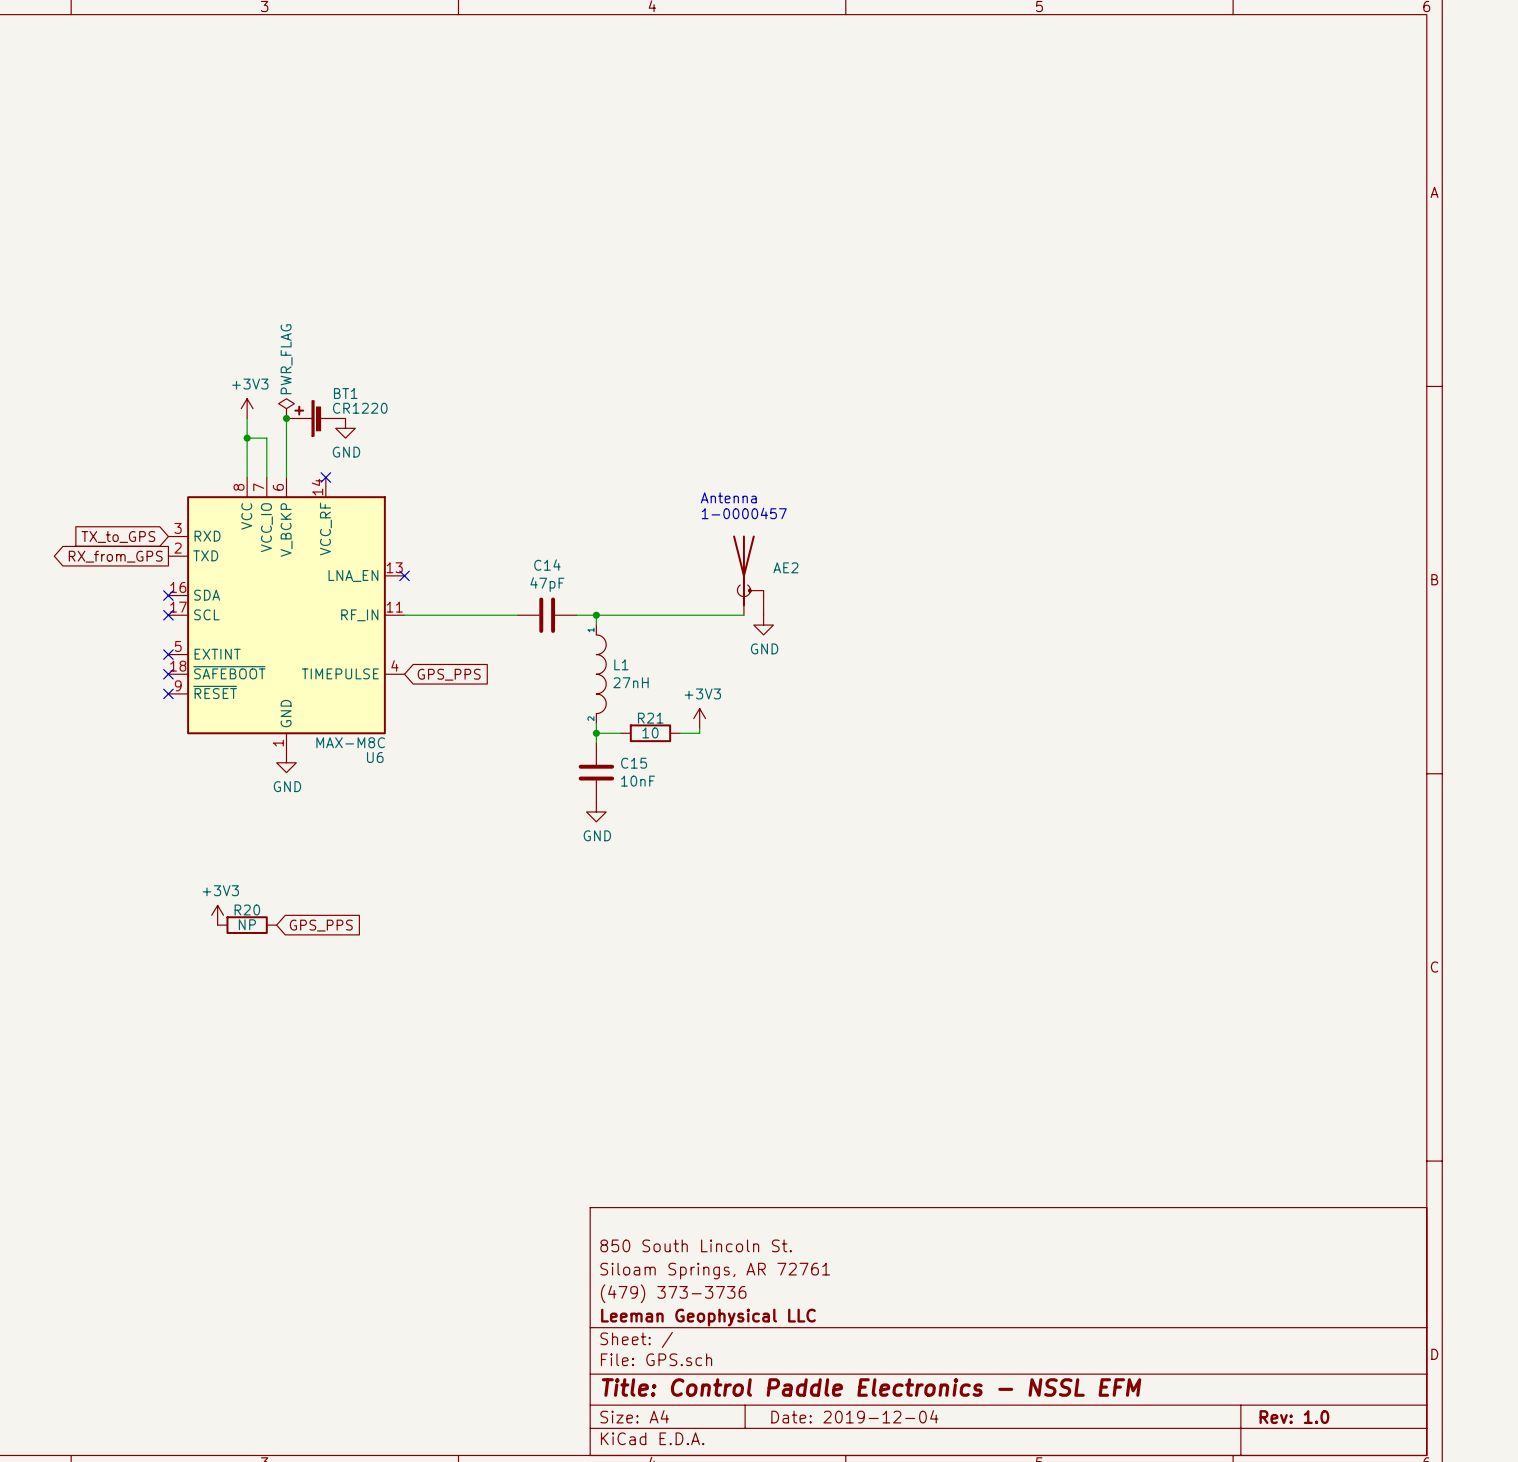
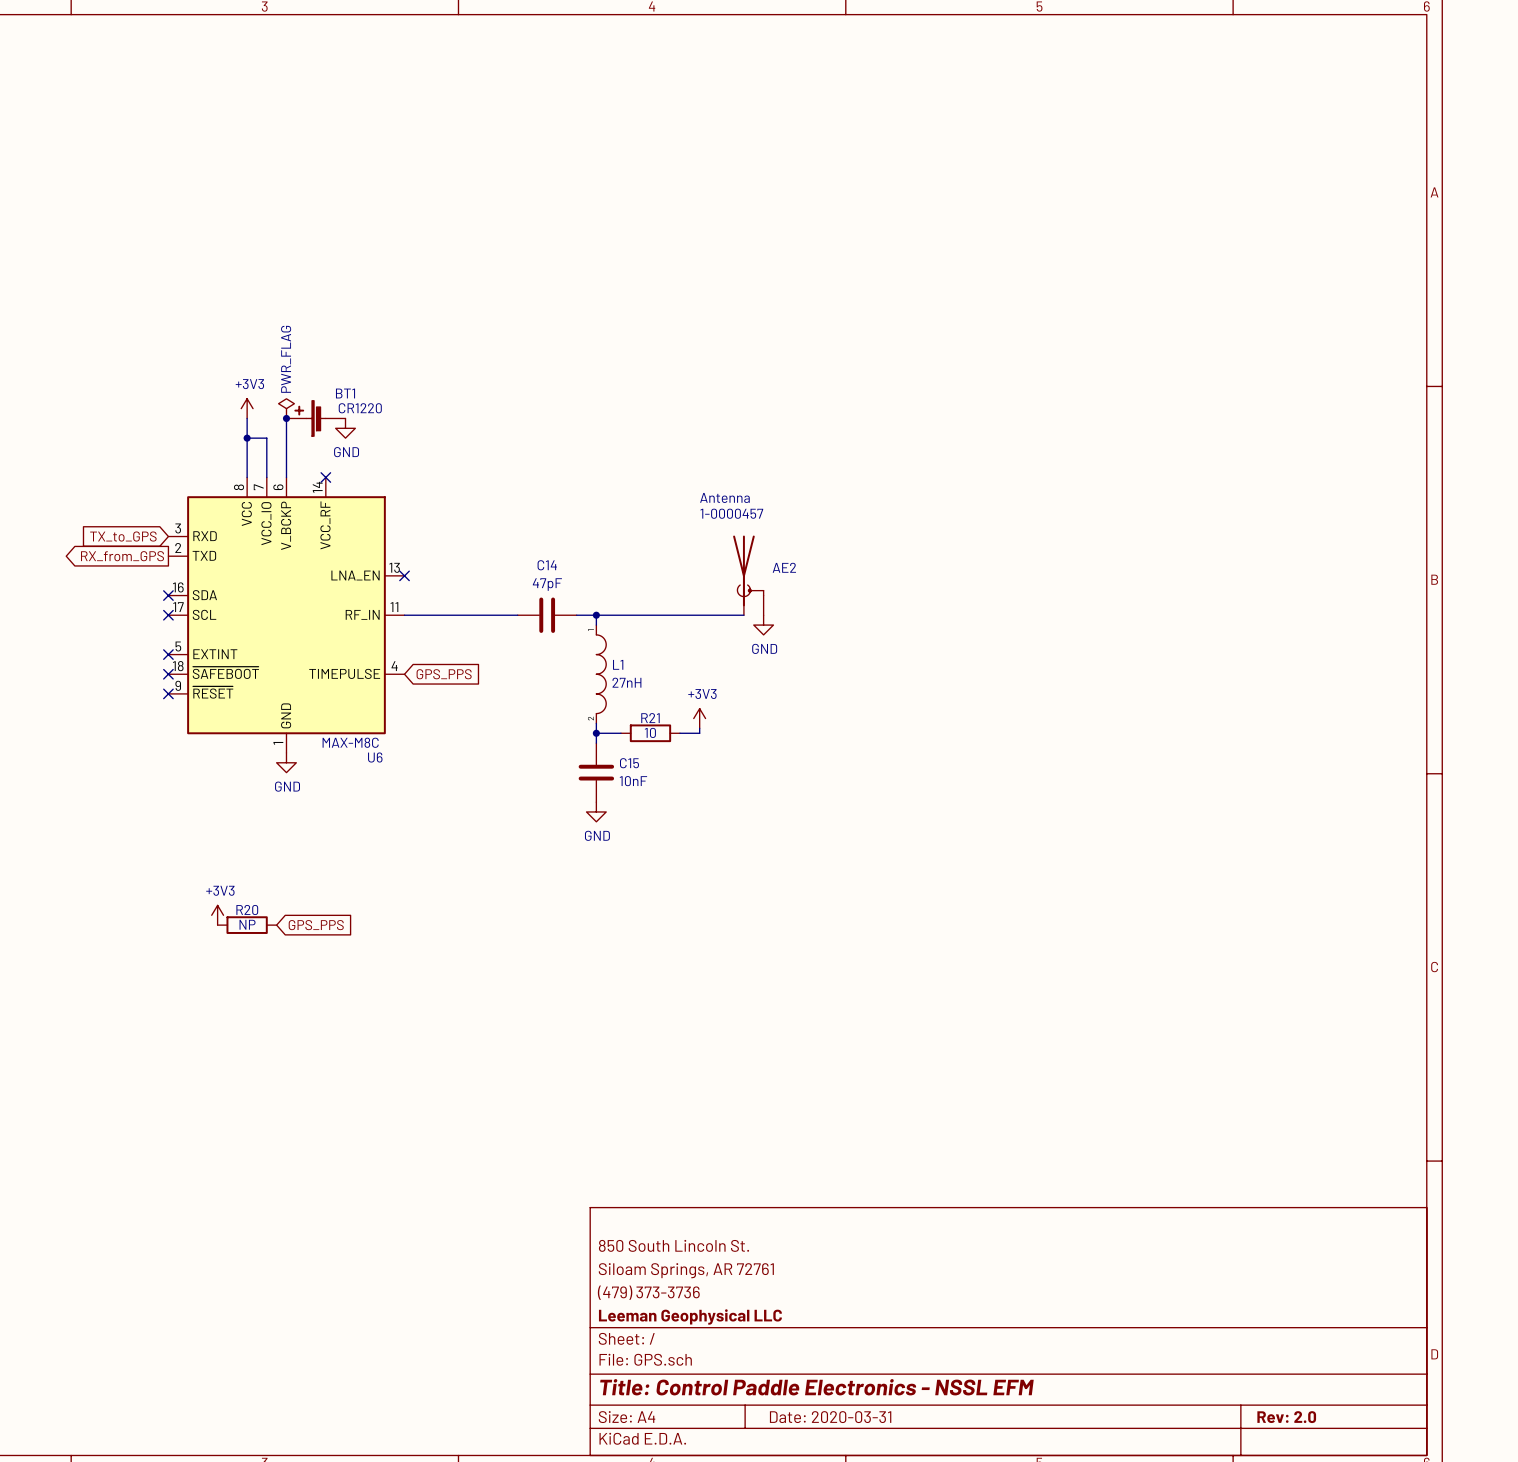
title block: Date: 2019-12-04 (854, 1416) -> Date: 2020-03-31 (830, 1417)
title block: Rev: 1.0 (1294, 1417) -> Rev: 2.0 (1286, 1417)

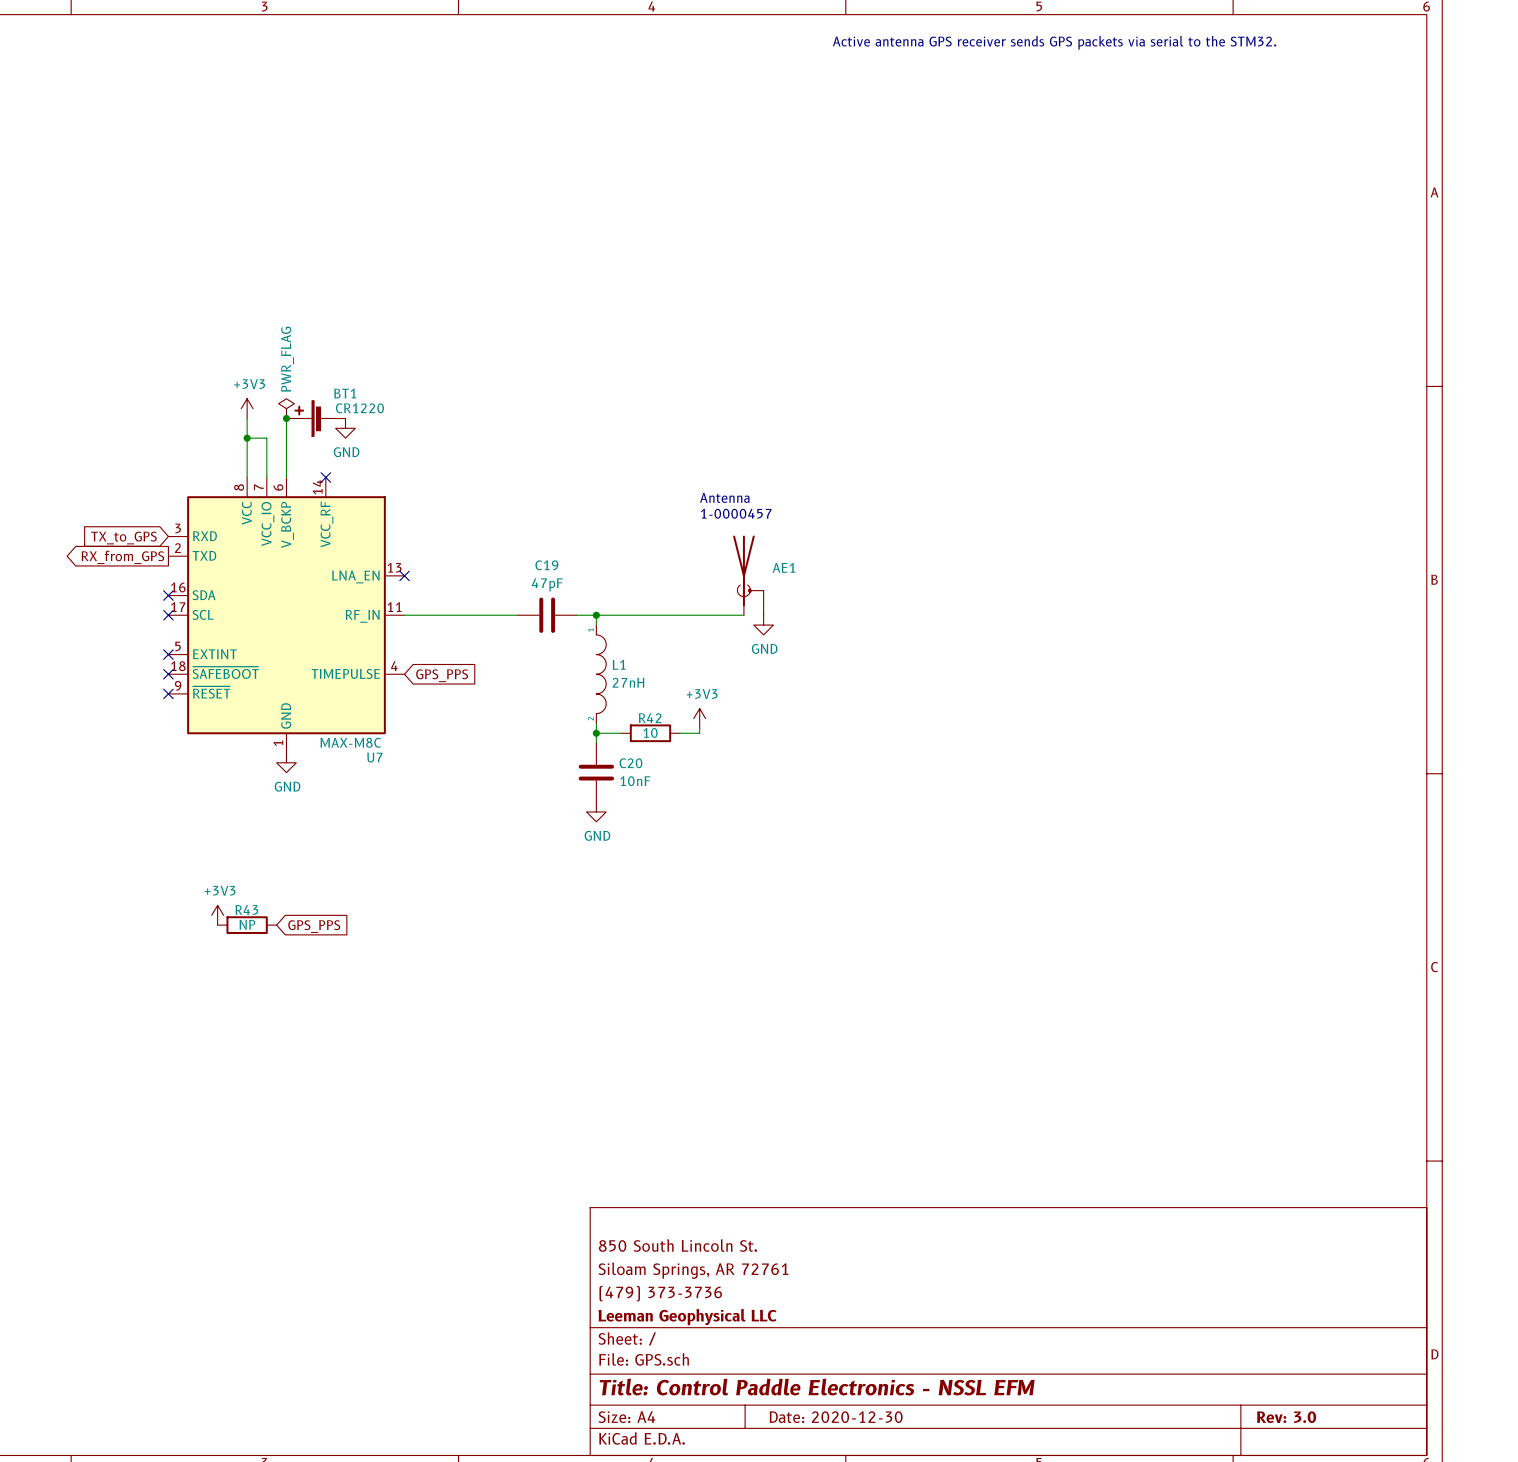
text: none -> Active antenna GPS receiver sends GPS packets via serial to the STM32. (1054, 42)
C14 name: C14 (547, 565) -> C19 (546, 565)
AE2 name: AE2 (784, 567) -> AE1 (783, 567)
R21 name: R21 (650, 718) -> R42 (650, 718)
U6 name: U6 (375, 757) -> U7 (374, 757)
C15 name: C15 (629, 763) -> C20 (630, 763)
R20 name: R20 (247, 909) -> R43 (246, 909)
title block: Date: 2020-03-31 (830, 1417) -> Date: 2020-12-30 (836, 1417)
title block: Rev: 2.0 (1286, 1417) -> Rev: 3.0 (1286, 1417)

